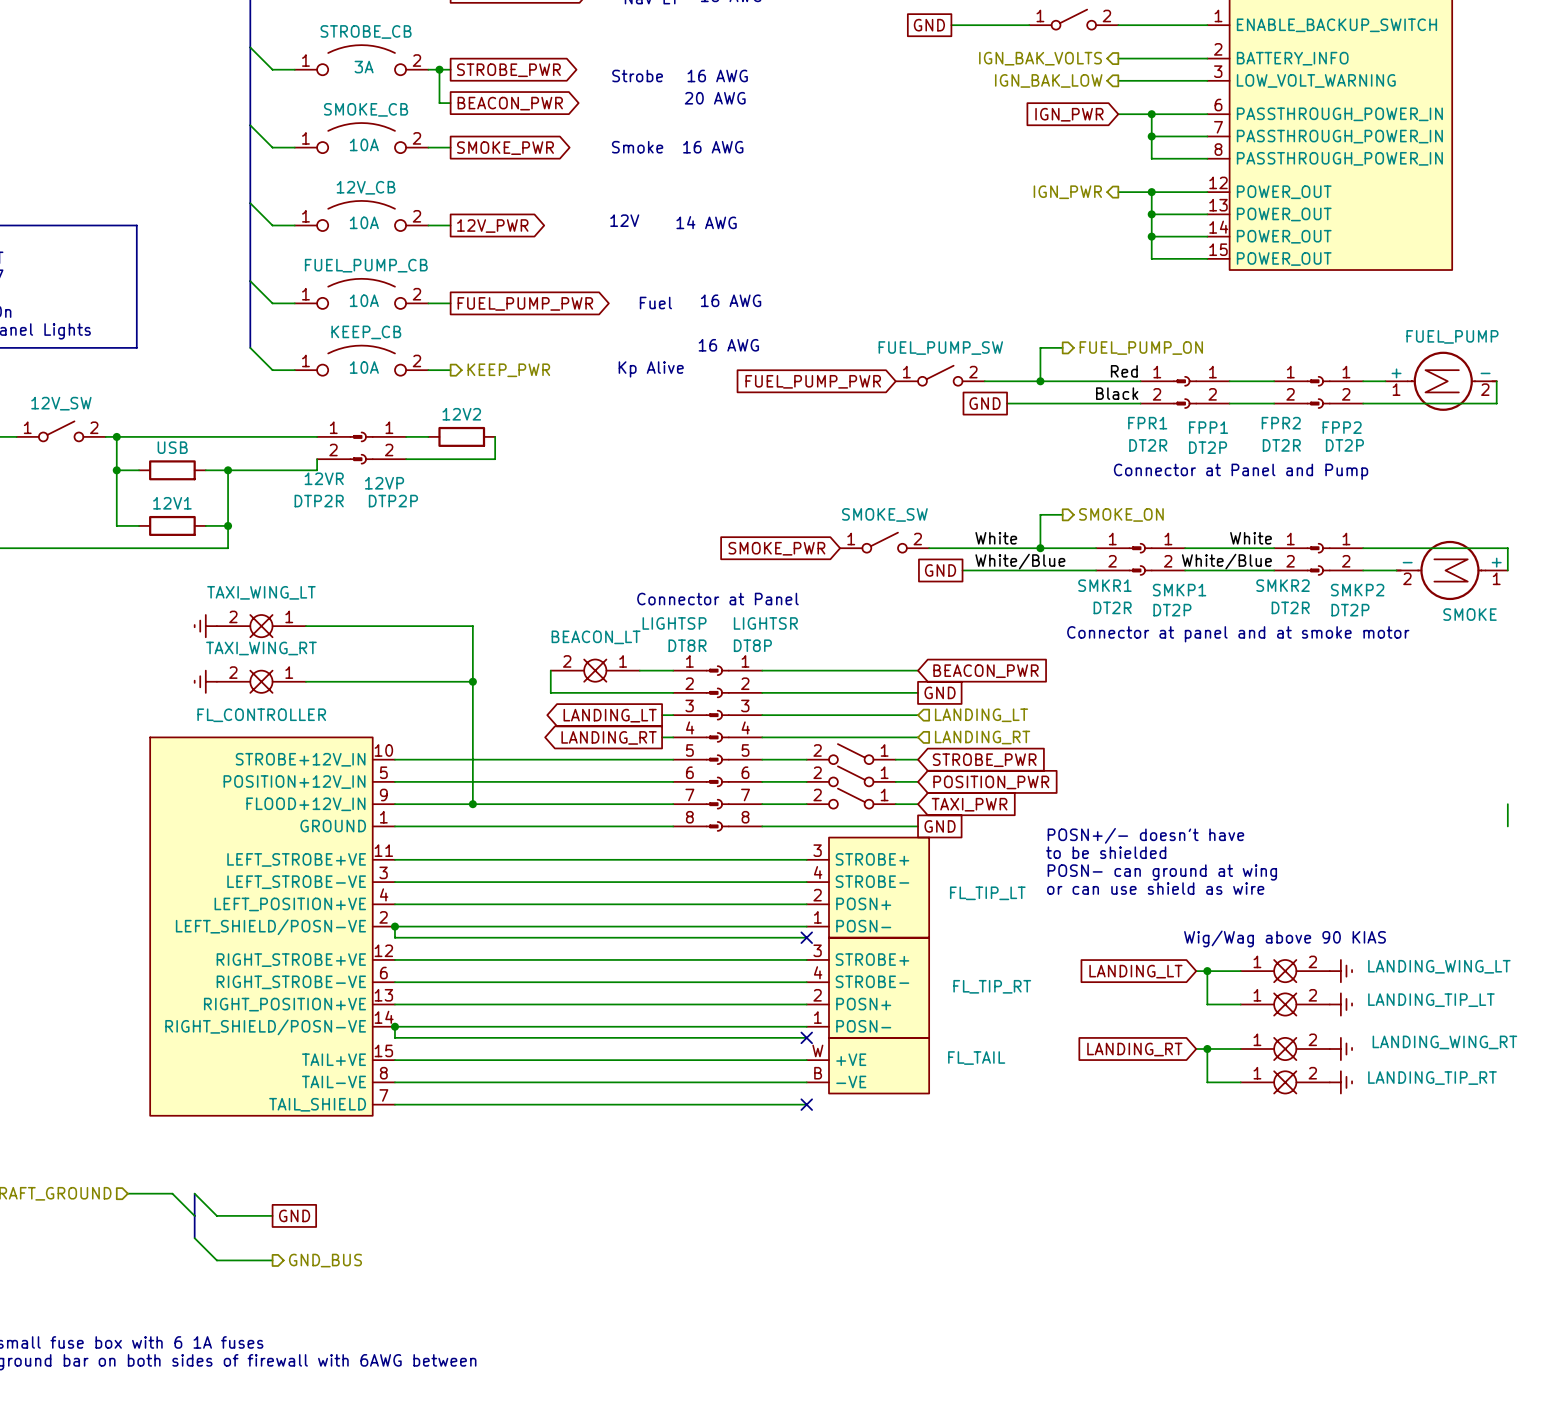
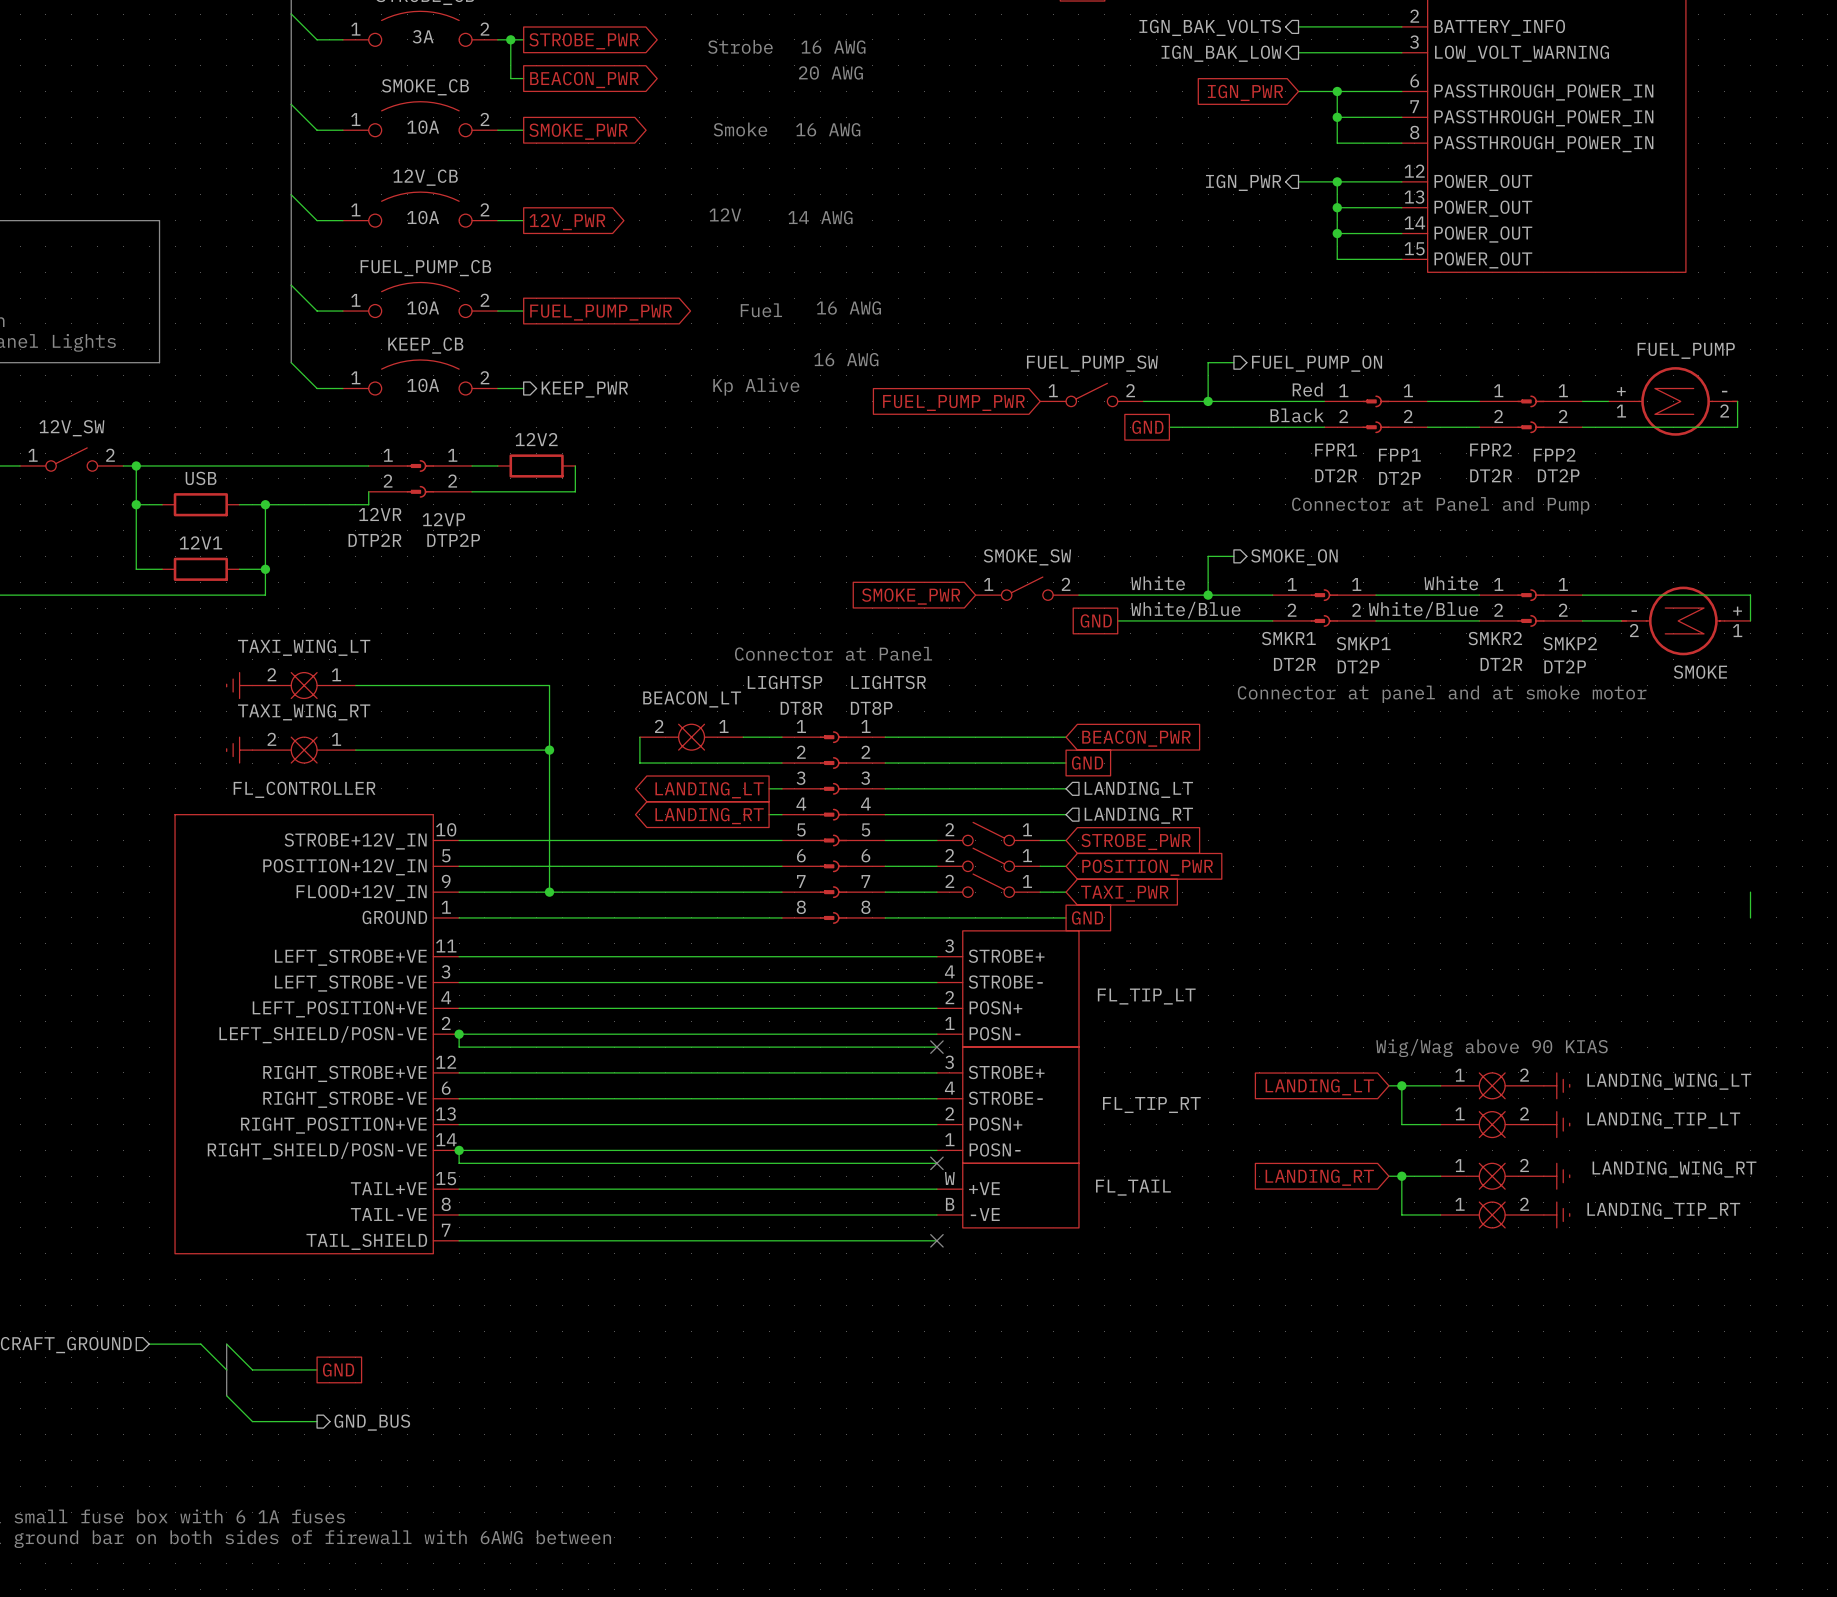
text: POSN+/- doesn't have (1145, 835) -> none
text: to be shielded (1106, 852) -> none
text: POSN- can ground at wing (1162, 872) -> none
text: or can use shield as wire (1155, 888) -> none

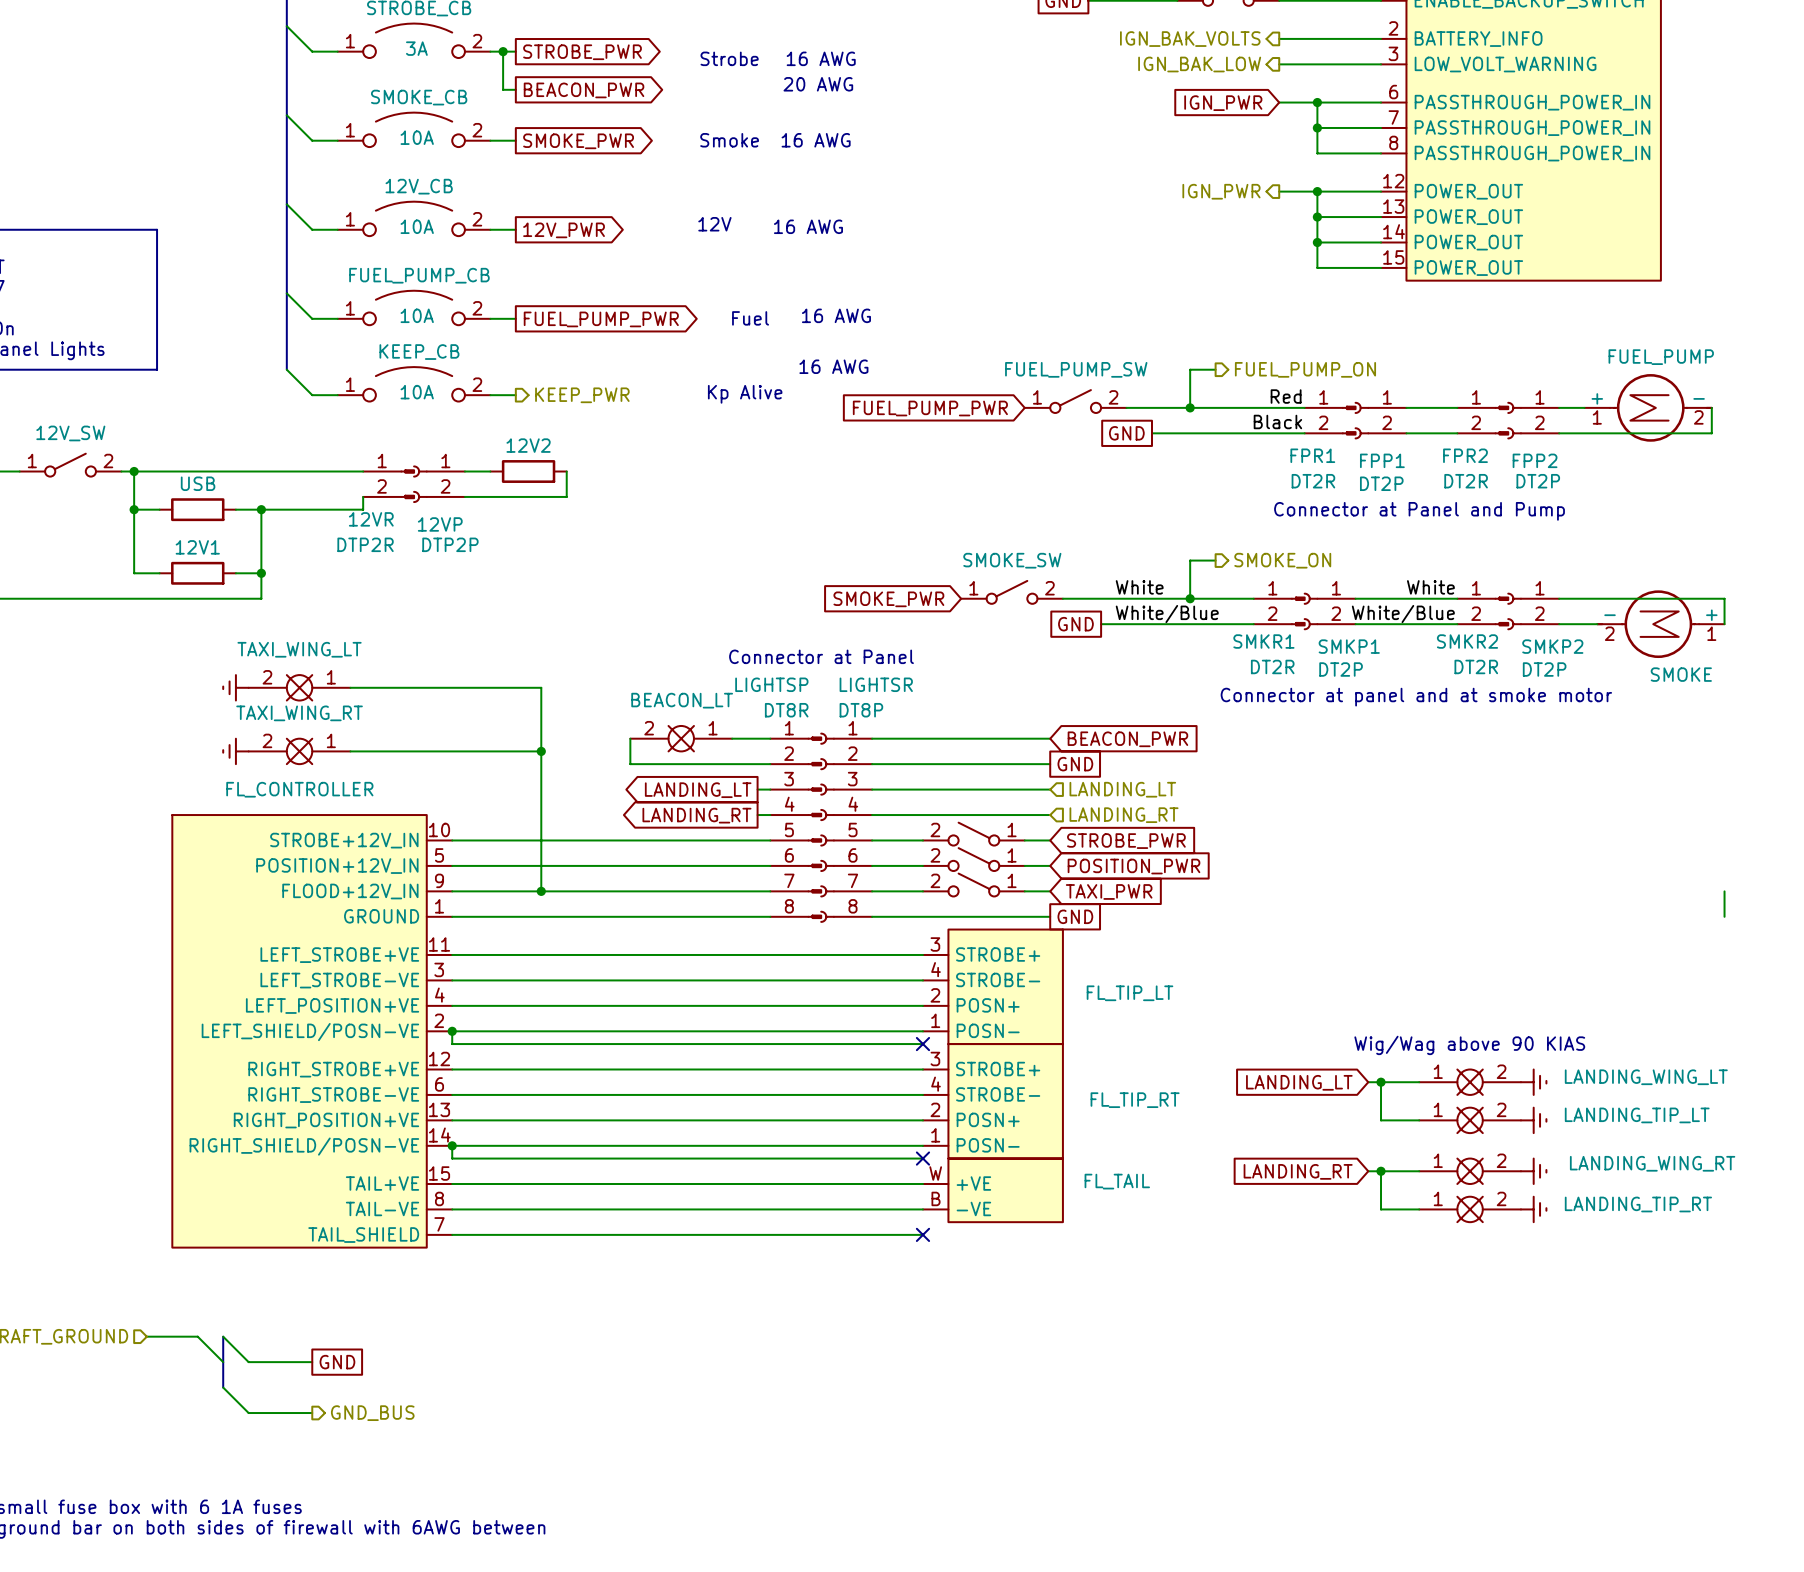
text: 14 AWG (820, 217) -> 16 AWG (808, 226)

